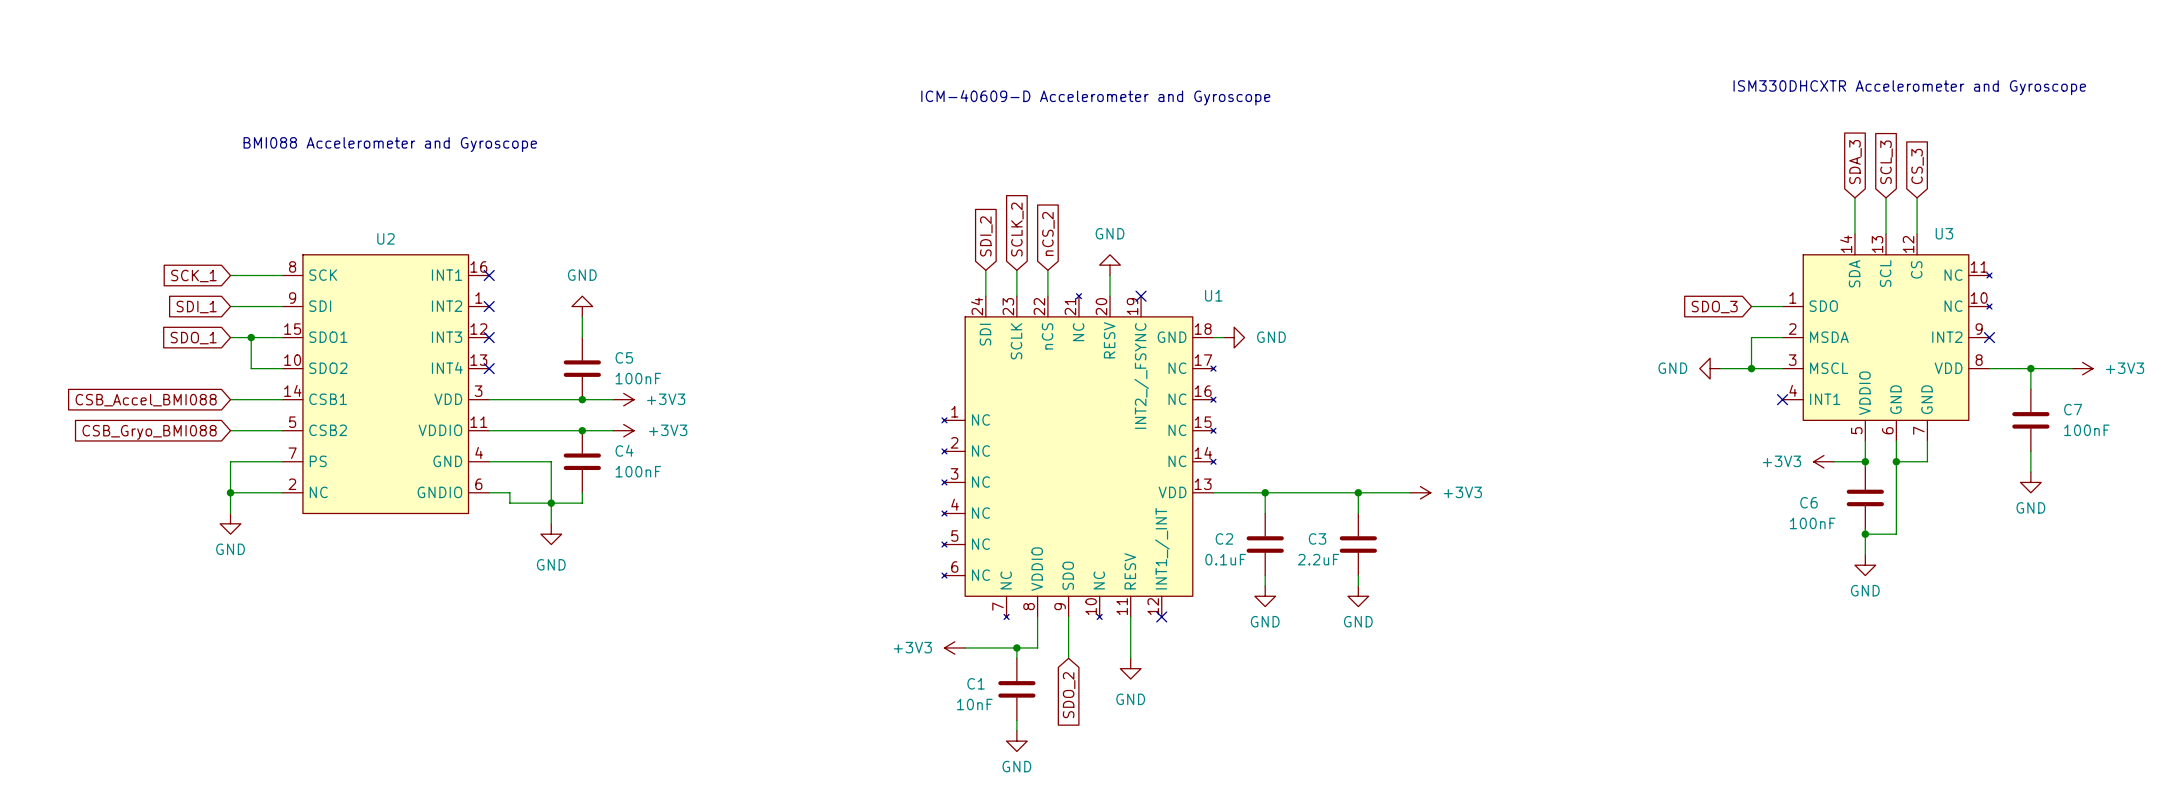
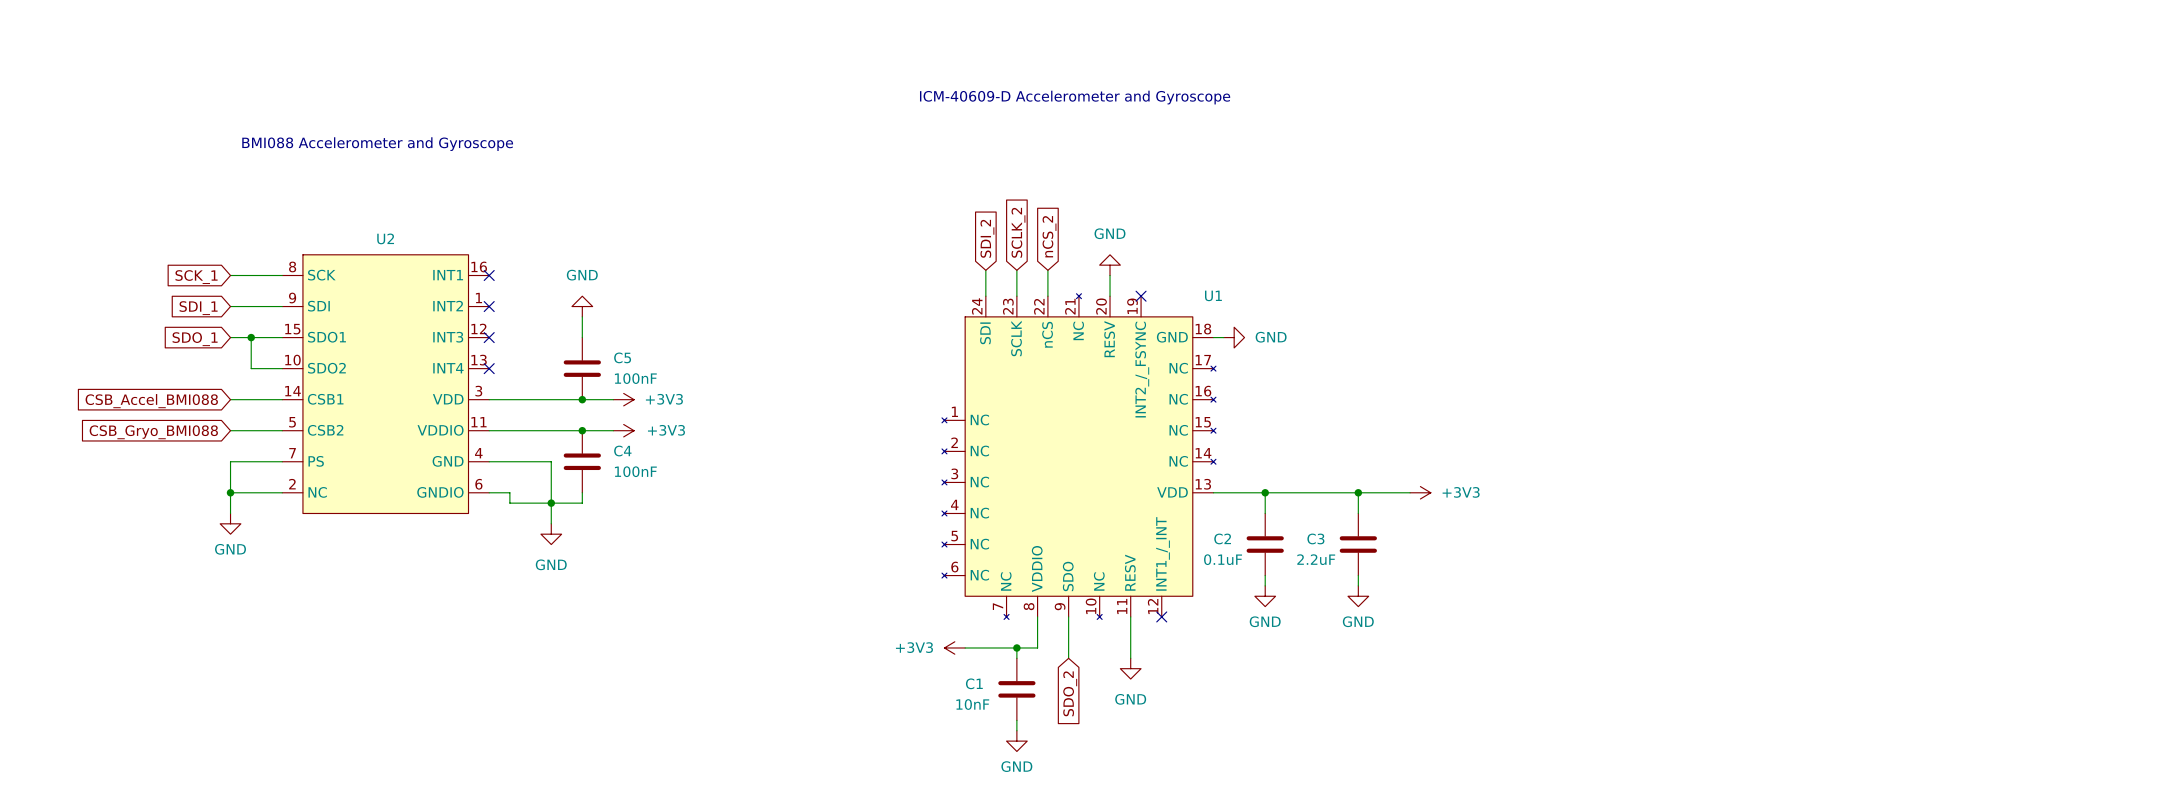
text: ISM330DHCXTR Accelerometer and Gyroscope (1909, 87) -> none
global label: SDA_3 (1855, 162) -> none
global label: SCL_3 (1886, 162) -> none
global label: CS_3 (1917, 166) -> none
wire: (1854, 197) (1854, 234) -> none
wire: (1886, 197) (1886, 234) -> none
wire: (1917, 197) (1917, 234) -> none
wire: (1751, 306) (1782, 306) -> none
global label: SDO_3 (1714, 307) -> none
wire: (1782, 337) (1751, 337) (1751, 368) -> none
U3: (1887, 337) -> none
no-connect mark: (1989, 337) -> none
power symbol: GND (1710, 368) -> none
wire: (1720, 368) (1782, 368) -> none
junction: (1751, 368) -> none
wire: (1989, 368) (2072, 368) -> none
wire: (2030, 368) (2030, 389) -> none
junction: (2030, 368) -> none
power symbol: +3V3 (2082, 368) -> none
no-connect mark: (1782, 399) -> none
C7: 100nF (2030, 420) -> none
wire: (1865, 441) (1865, 466) -> none
wire: (1896, 441) (1896, 534) (1865, 534) -> none
wire: (1927, 441) (1927, 461) (1896, 461) -> none
wire: (2030, 451) (2030, 472) -> none
power symbol: +3V3 (1823, 461) -> none
wire: (1834, 461) (1865, 461) -> none
junction: (1865, 461) -> none
junction: (1896, 461) -> none
power symbol: GND (2030, 482) -> none
C6: 100nF (1865, 497) -> none
wire: (1865, 529) (1865, 554) -> none
junction: (1865, 534) -> none
power symbol: GND (1865, 565) -> none

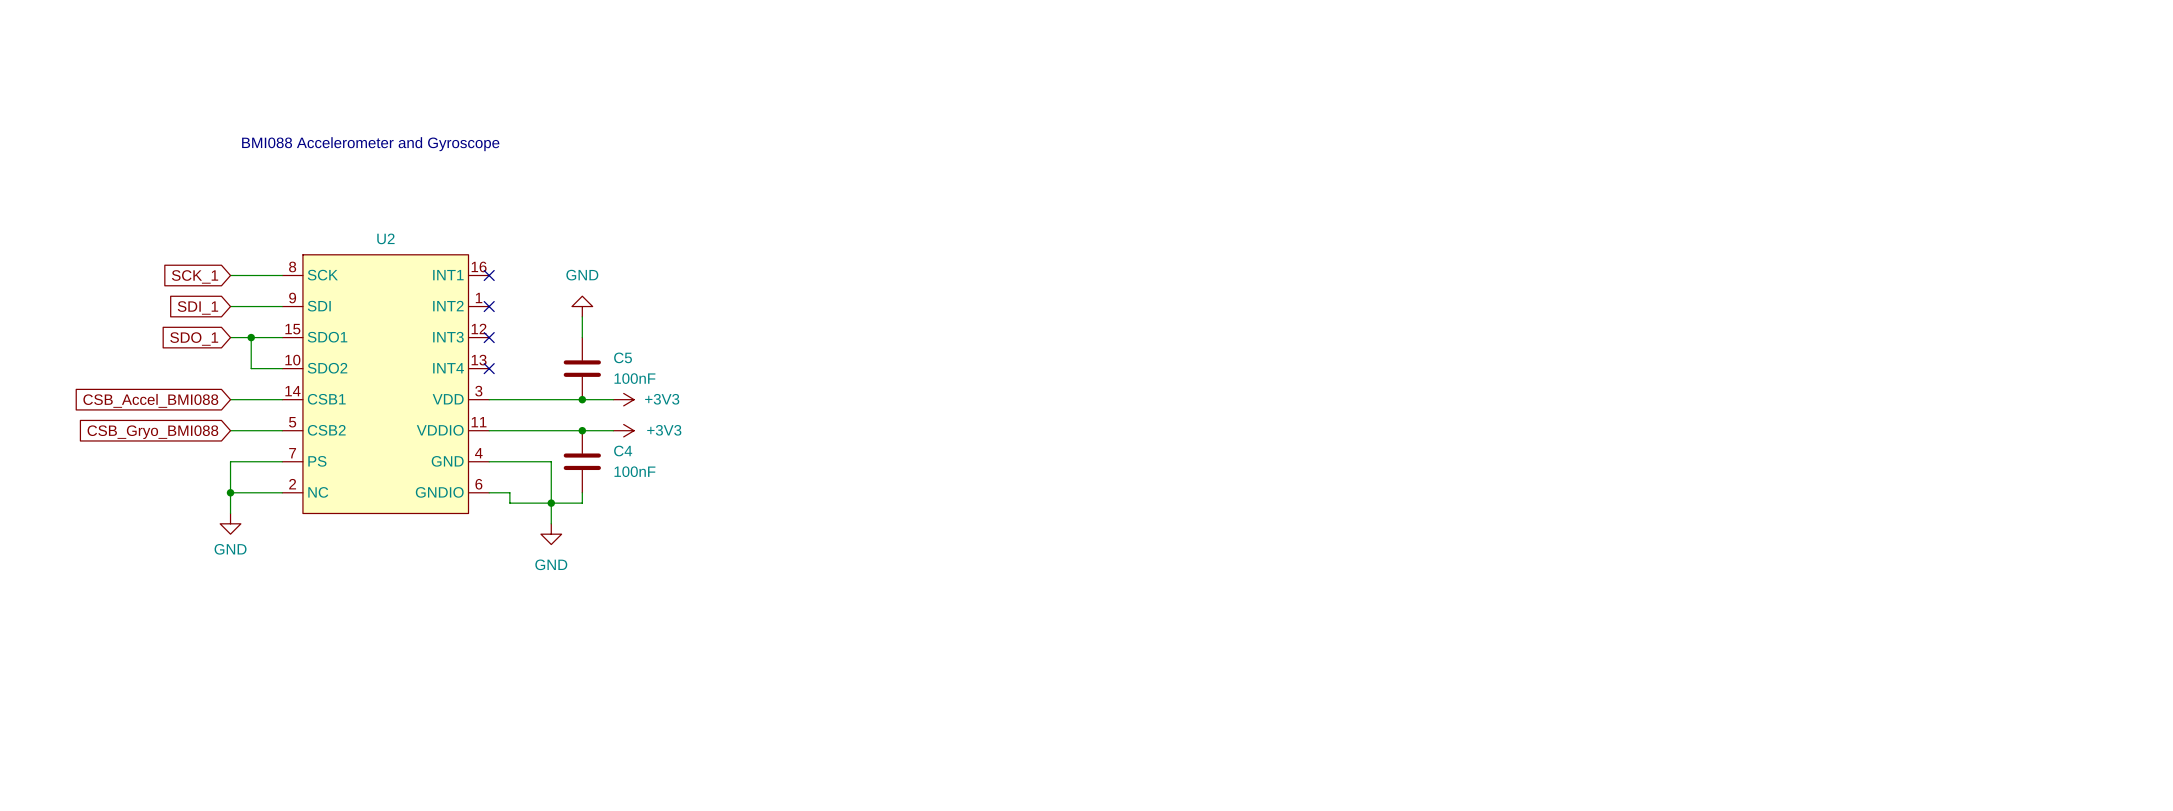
text: ICM-40609-D Accelerometer and Gyroscope (1075, 97) -> none
global label: SCLK_2 (1018, 232) -> none
global label: nCS_2 (1049, 236) -> none
global label: SDI_2 (987, 238) -> none
power symbol: GND (1110, 265) -> none
wire: (985, 270) (985, 296) -> none
wire: (1016, 270) (1016, 296) -> none
wire: (1047, 270) (1047, 296) -> none
wire: (1110, 275) (1110, 296) -> none
no-connect mark: (1141, 296) -> none
wire: (1213, 337) (1223, 337) -> none
power symbol: GND (1234, 337) -> none
U1: (1078, 456) -> none
wire: (1213, 492) (1410, 492) -> none
wire: (1265, 492) (1265, 513) -> none
junction: (1265, 492) -> none
wire: (1358, 492) (1358, 513) -> none
junction: (1358, 492) -> none
power symbol: +3V3 (1420, 492) -> none
C2: 0.1uF (1265, 544) -> none
C3: 2.2uF (1358, 544) -> none
wire: (1265, 575) (1265, 585) -> none
wire: (1358, 575) (1358, 585) -> none
power symbol: GND (1265, 596) -> none
power symbol: GND (1358, 596) -> none
wire: (1037, 616) (1037, 647) (965, 647) -> none
wire: (1068, 616) (1068, 658) -> none
wire: (1130, 616) (1130, 658) -> none
no-connect mark: (1161, 616) -> none
power symbol: +3V3 (954, 647) -> none
wire: (1016, 647) (1016, 658) -> none
junction: (1016, 647) -> none
power symbol: GND (1130, 668) -> none
C1: 10nF (1016, 689) -> none
global label: SDO_2 (1070, 693) -> none
wire: (1016, 720) (1016, 730) -> none
power symbol: GND (1016, 741) -> none

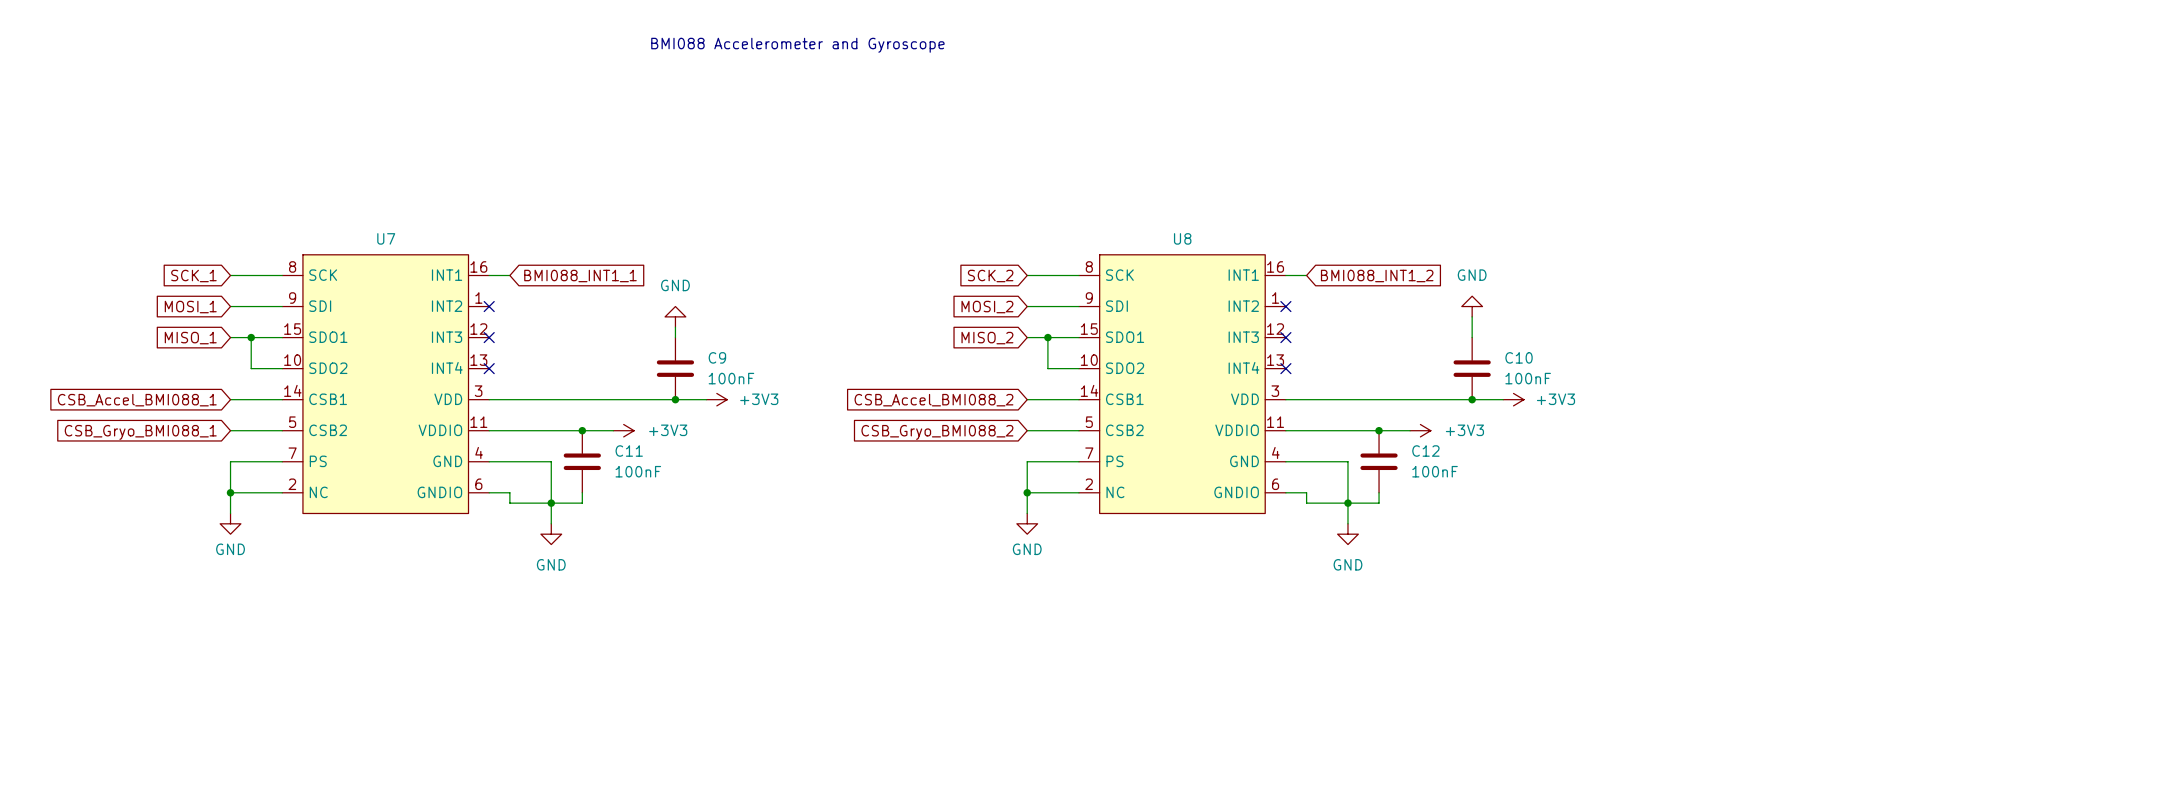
text: none -> BMI088 Accelerometer and Gyroscope (797, 45)
text: BMI088 Accelerometer and Gyroscope (370, 144) -> none
U2 name: U2 (385, 238) -> U7 (386, 238)
wire: none -> (489, 275) (509, 275)
no-connect mark: (489, 275) -> none
wire: none -> (1027, 275) (1078, 275)
wire: none -> (1285, 275) (1306, 275)
global label: none -> BMI088_INT1_1 (580, 275)
global label: none -> SCK_2 (990, 275)
global label: none -> BMI088_INT1_2 (1377, 275)
power symbol position: GND (582, 306) -> GND (675, 316)
wire: none -> (1027, 306) (1078, 306)
no-connect mark: none -> (1285, 306)
power symbol: none -> GND (1472, 306)
global label: SDI_1 (197, 307) -> MOSI_1 (190, 307)
global label: none -> MOSI_2 (987, 307)
wire: (582, 316) (582, 337) -> none
wire: none -> (1472, 316) (1472, 337)
wire: none -> (675, 327) (675, 337)
wire: none -> (1027, 337) (1078, 337)
wire: none -> (1047, 337) (1047, 368) (1078, 368)
junction: none -> (1047, 337)
no-connect mark: none -> (1285, 337)
global label: SDO_1 (194, 339) -> MISO_1 (190, 338)
global label: none -> MISO_2 (987, 338)
C5: 100nF (582, 368) -> none
C9: none -> 100nF (675, 368)
no-connect mark: none -> (1285, 368)
C10: none -> 100nF (1472, 368)
U8: none -> (1182, 384)
junction: (582, 399) -> none
wire: none -> (613, 399) (706, 399)
power symbol position: +3V3 (623, 399) -> +3V3 (716, 399)
junction: none -> (675, 399)
wire: none -> (1027, 399) (1078, 399)
wire: none -> (1285, 399) (1503, 399)
junction: none -> (1472, 399)
power symbol: none -> +3V3 (1513, 399)
global label: CSB_Accel_BMI088 (150, 400) -> CSB_Accel_BMI088_1 (137, 400)
global label: none -> CSB_Accel_BMI088_2 (933, 400)
wire: none -> (1027, 430) (1078, 430)
wire: none -> (1285, 430) (1410, 430)
junction: none -> (1379, 430)
power symbol: none -> +3V3 (1420, 430)
global label: CSB_Gryo_BMI088 (152, 432) -> CSB_Gryo_BMI088_1 (140, 432)
global label: none -> CSB_Gryo_BMI088_2 (937, 432)
C4 name: C4 (623, 451) -> C11 (629, 451)
wire: none -> (1078, 461) (1027, 461) (1027, 513)
wire: none -> (1285, 461) (1347, 461) (1347, 523)
C12: none -> 100nF (1379, 461)
wire: none -> (1027, 492) (1078, 492)
junction: none -> (1027, 492)
wire: none -> (1285, 492) (1306, 492) (1306, 503) (1379, 503) (1379, 492)
junction: none -> (1347, 503)
power symbol: none -> GND (1027, 523)
power symbol: none -> GND (1347, 534)

